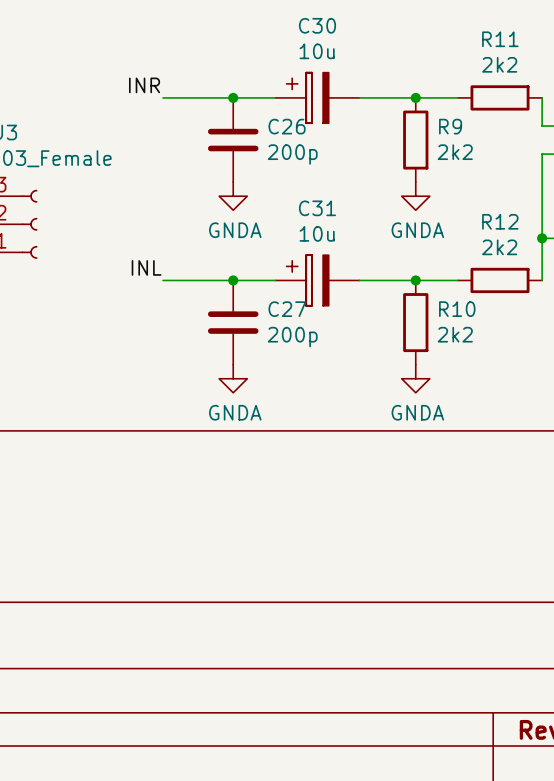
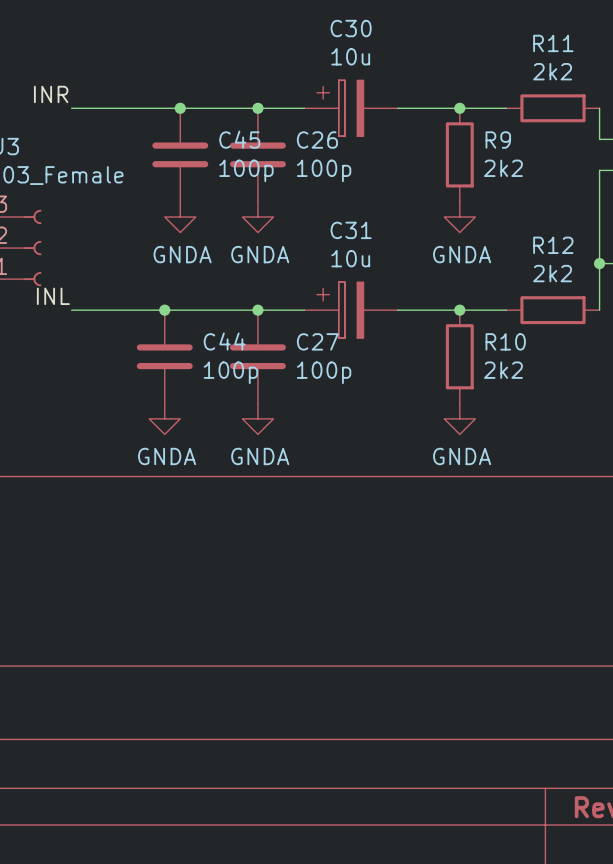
label position: INR (144, 85) -> INR (51, 94)
wire: none -> (71, 108) (180, 108)
junction: none -> (180, 108)
C45: none -> 100p (180, 154)
C26 value: 200p (292, 154) -> 100p (324, 170)
power symbol: none -> GNDA (180, 217)
label position: INL (146, 267) -> INL (53, 296)
wire: none -> (71, 310) (180, 310)
junction: none -> (164, 310)
C44: none -> 100p (164, 356)
C27 value: 200p (292, 337) -> 100p (324, 372)
power symbol: none -> GNDA (164, 418)

